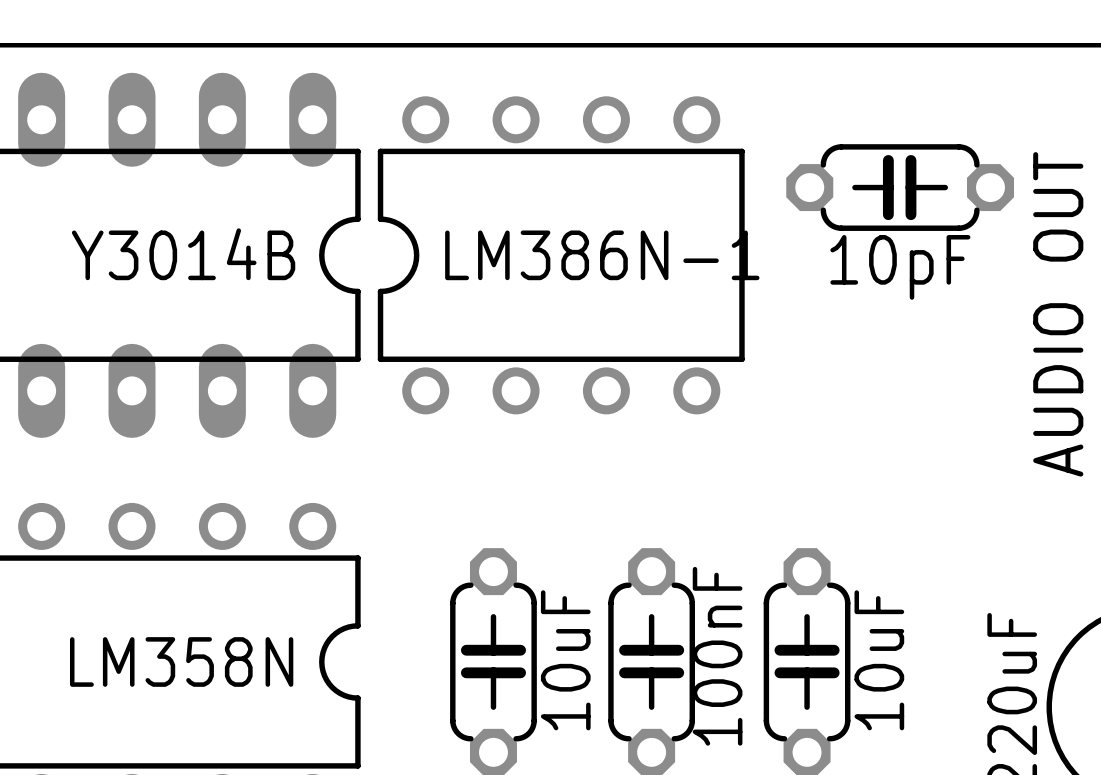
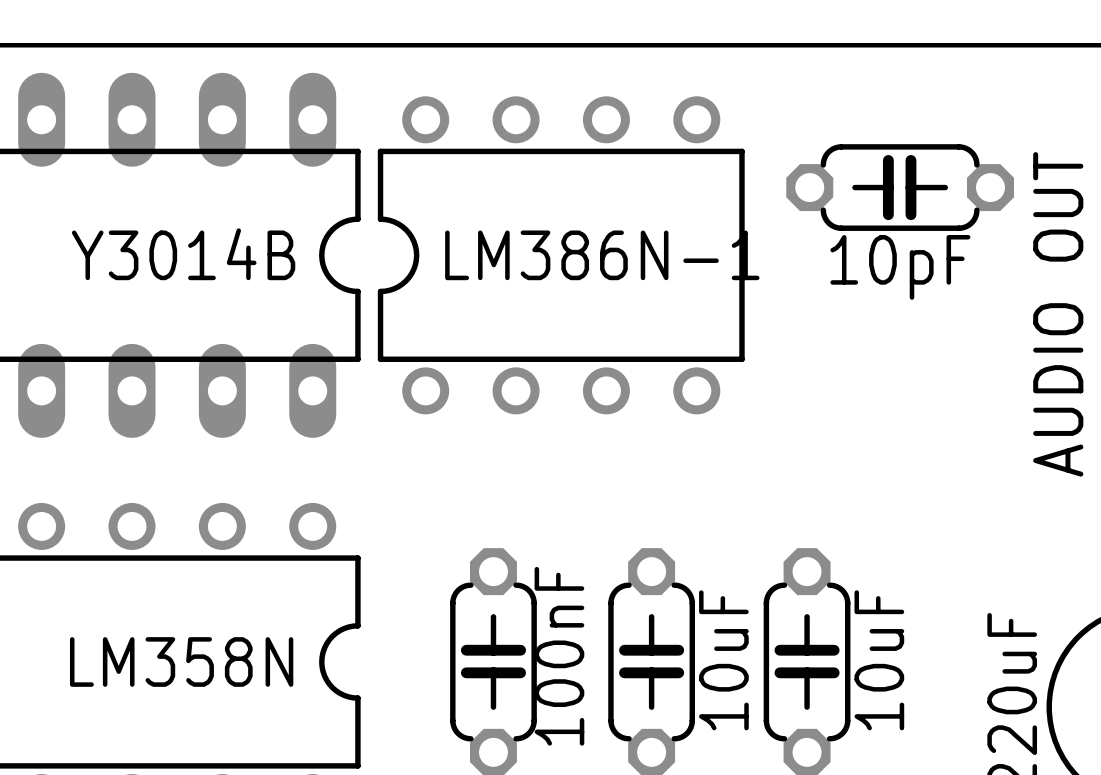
part value: 100nF (717, 656) -> 10uF (723, 660)
part value: 10uF (565, 660) -> 100nF (559, 656)

